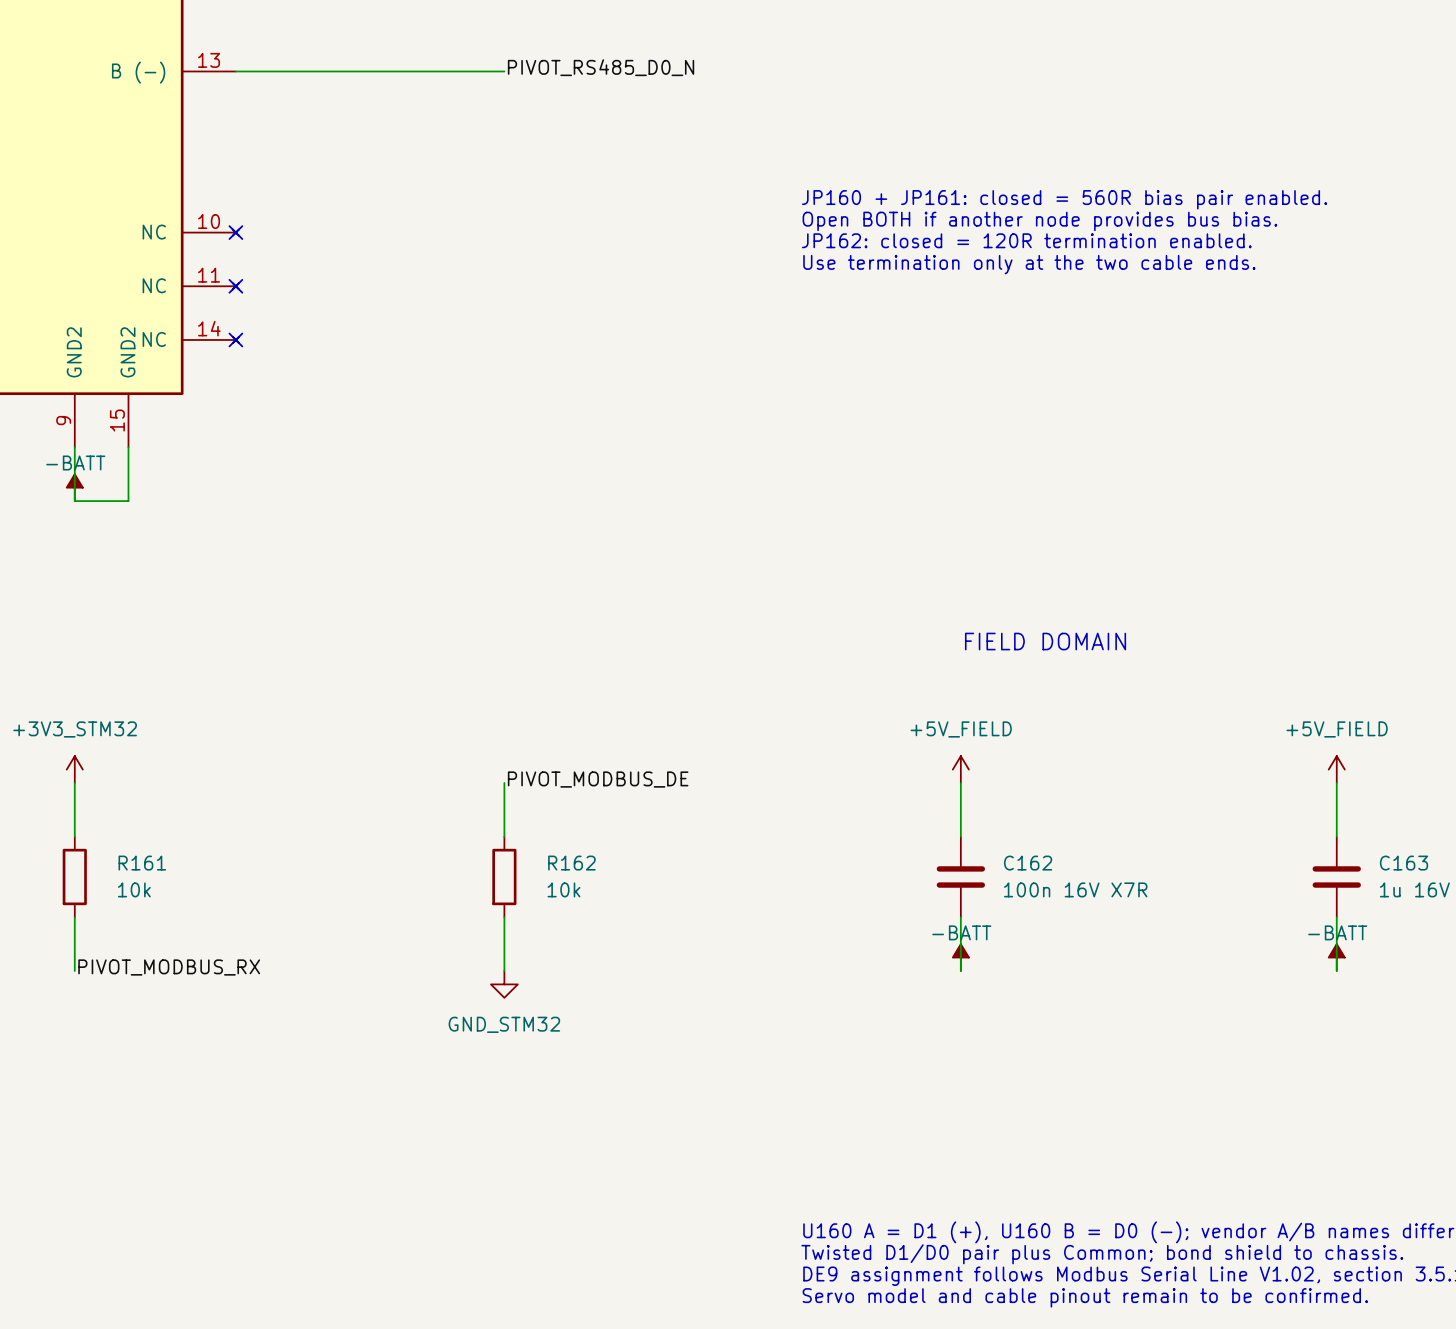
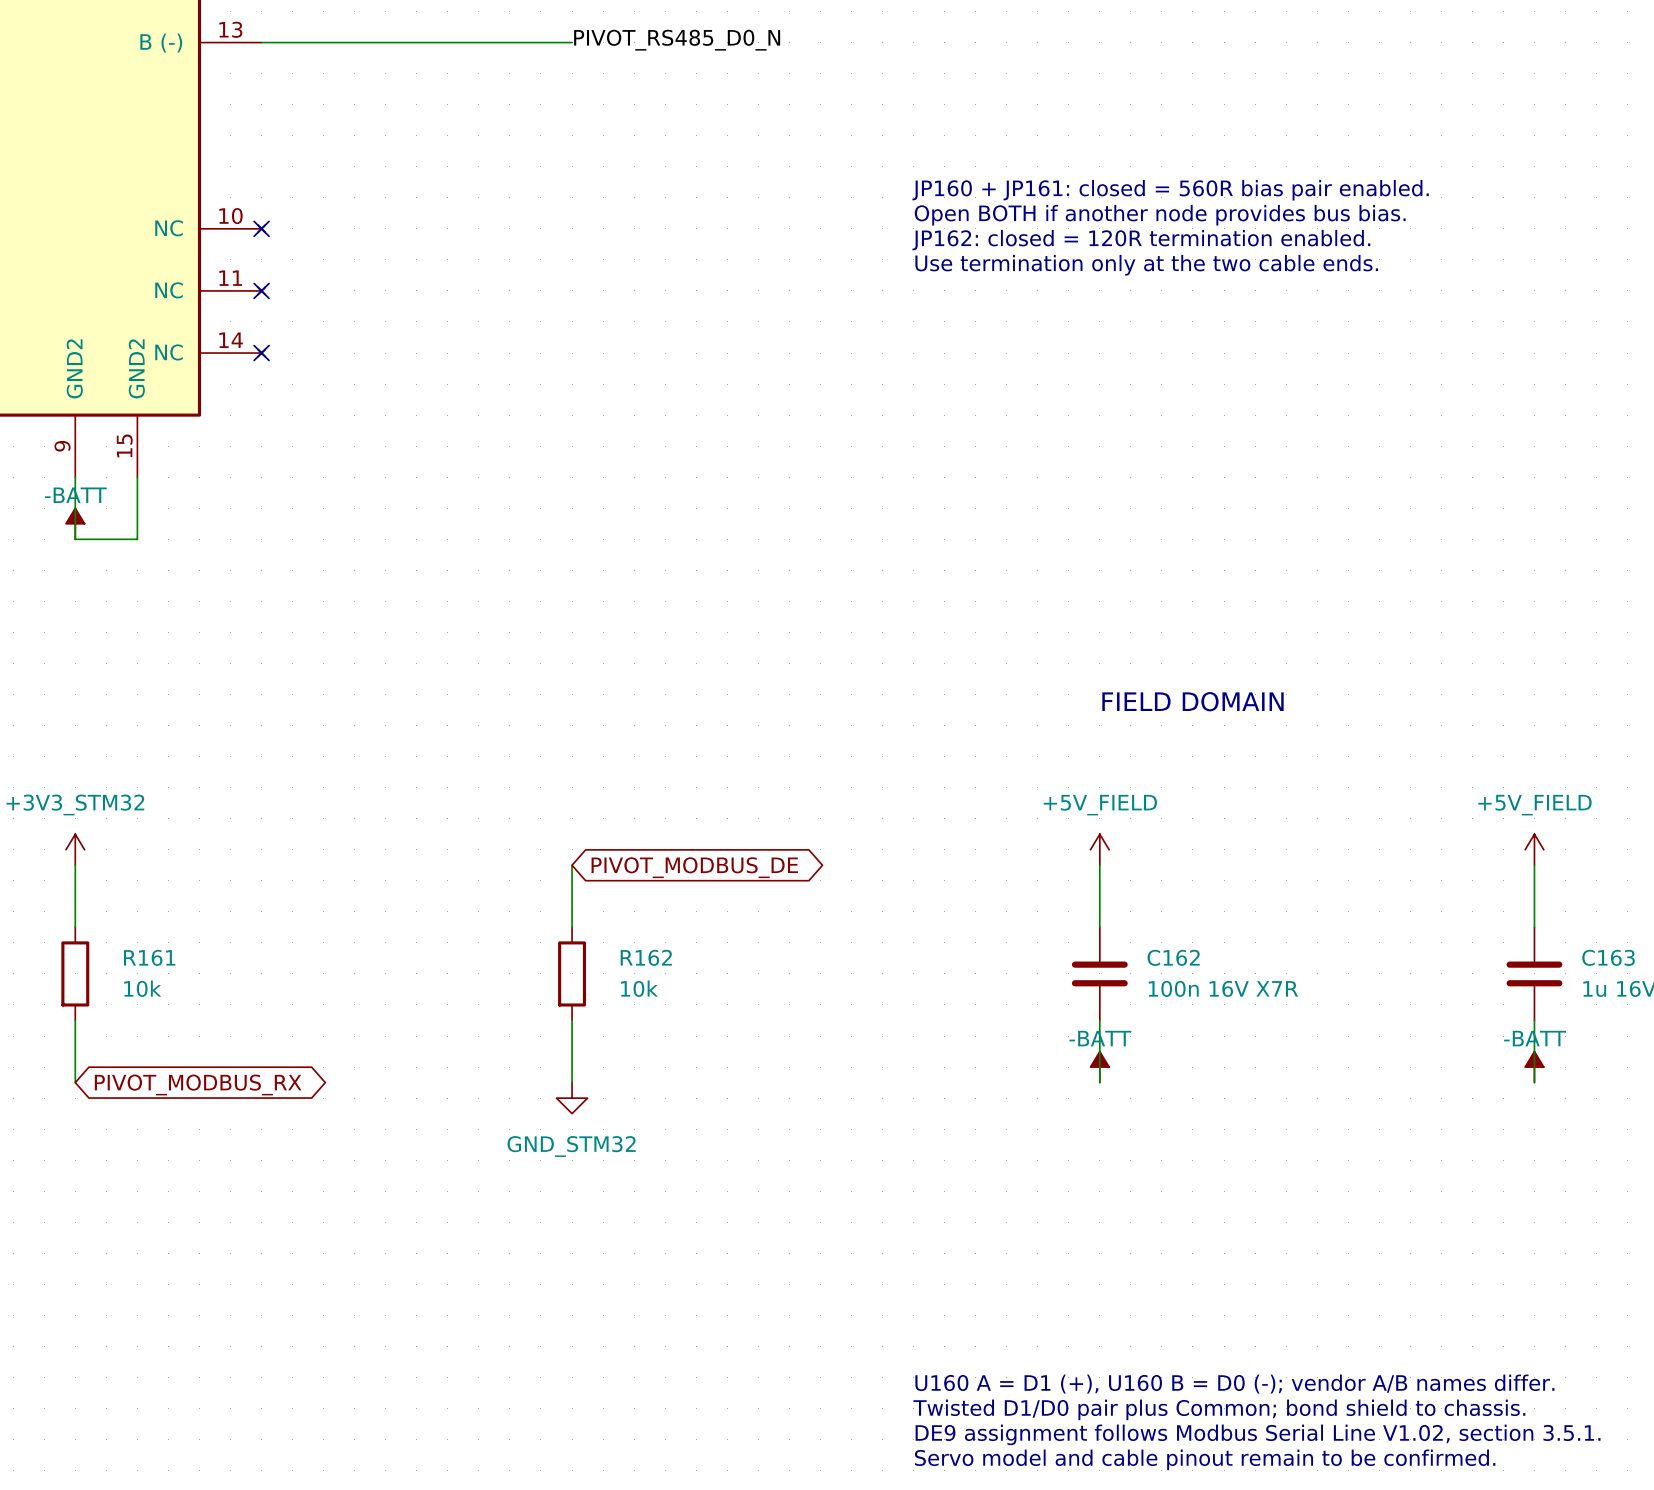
label: PIVOT_MODBUS_DE (598, 779) -> none
global label: none -> PIVOT_MODBUS_DE (694, 867)
label: PIVOT_MODBUS_RX (169, 967) -> none
global label: none -> PIVOT_MODBUS_RX (198, 1084)

